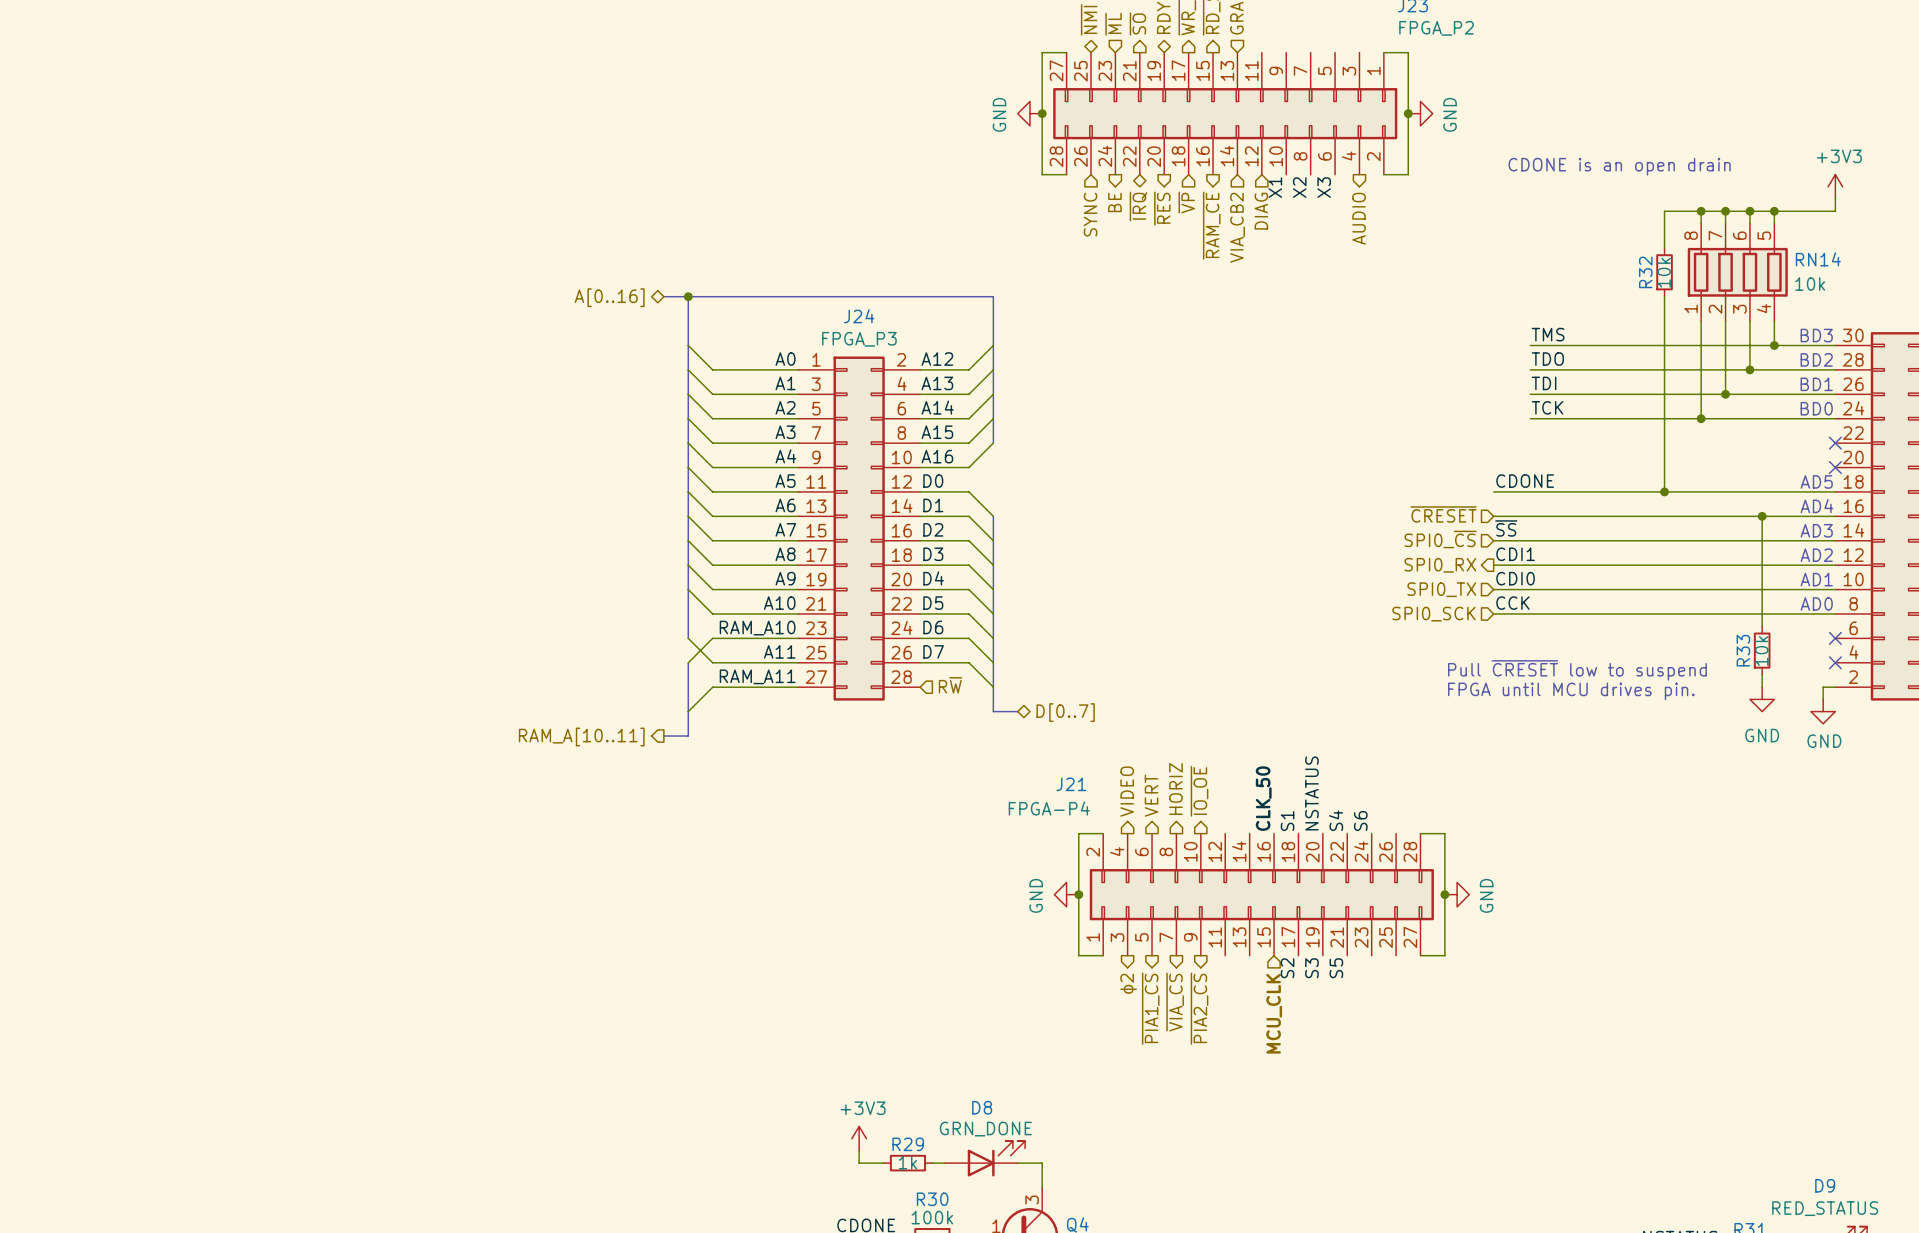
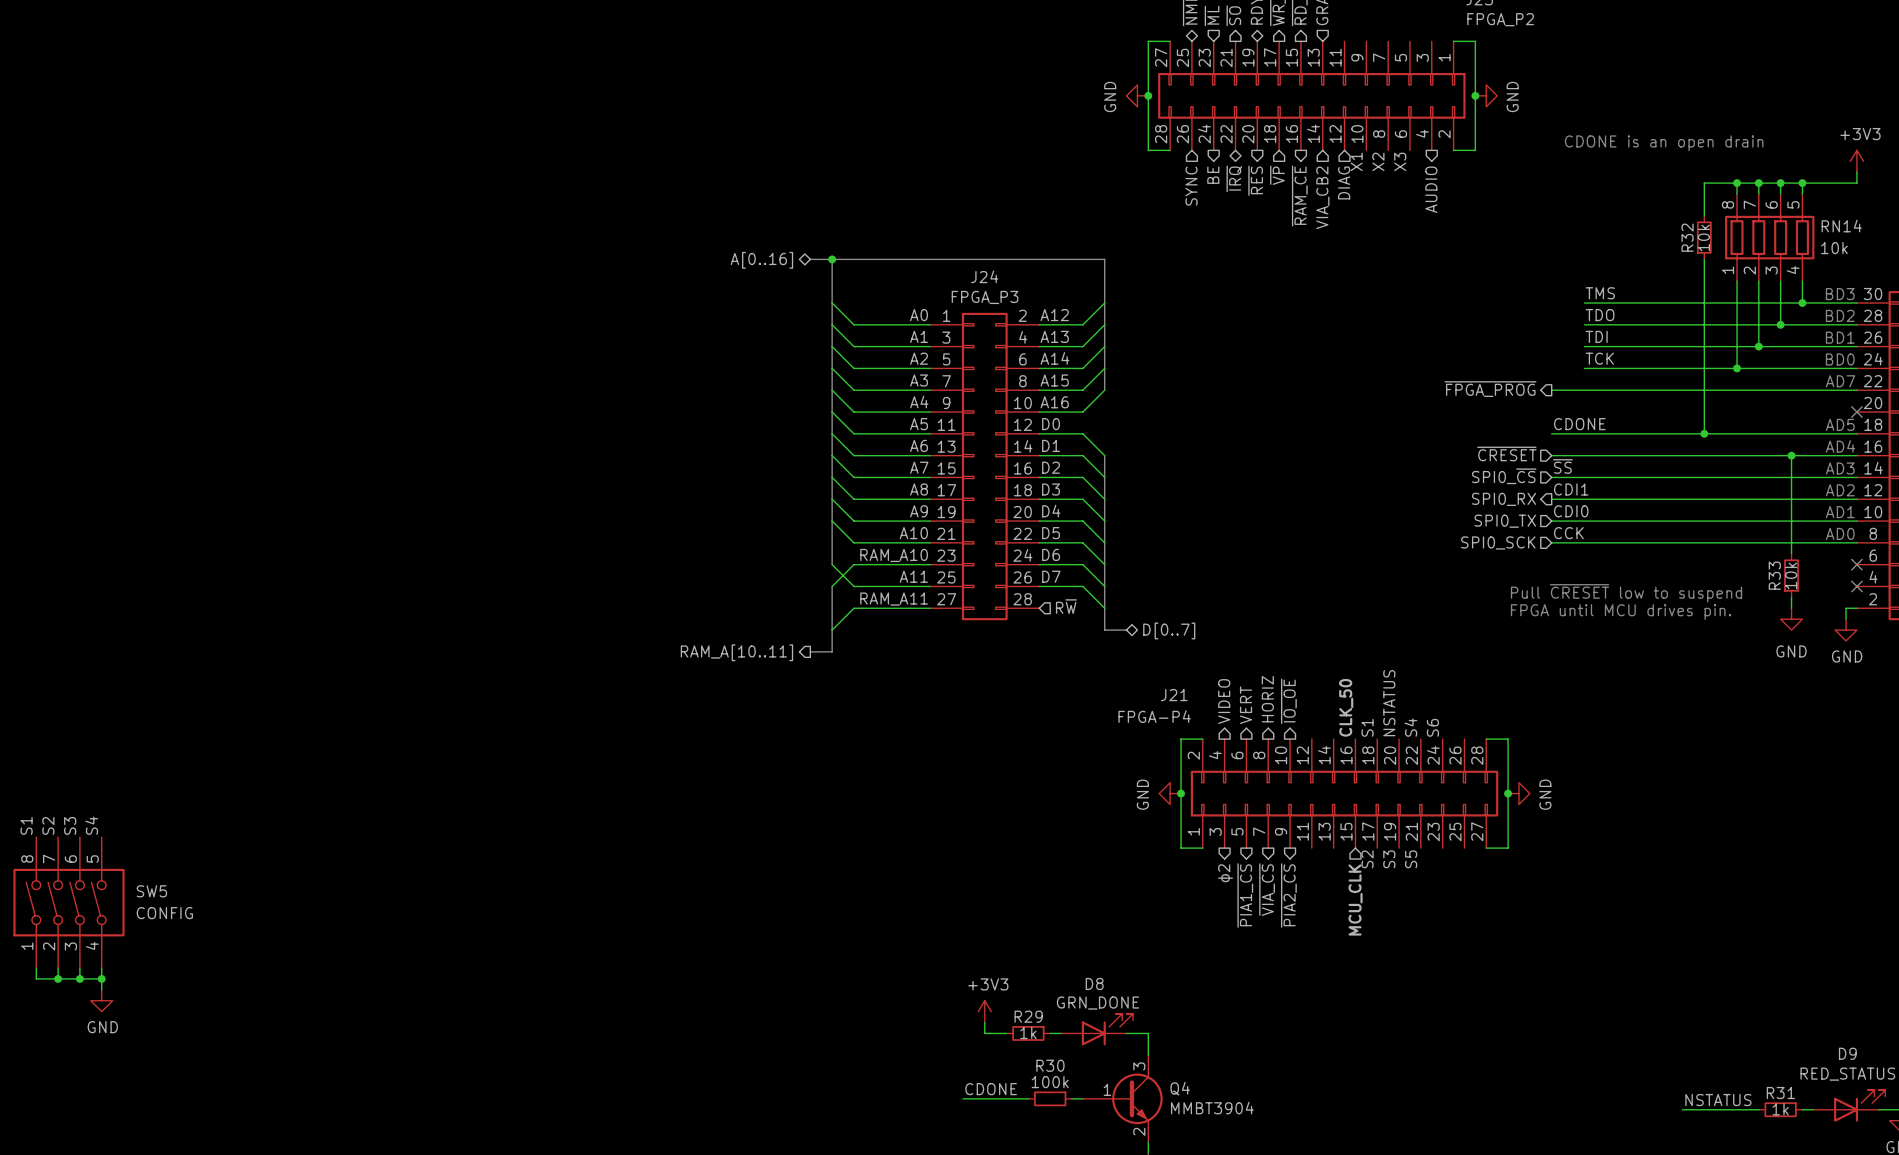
text: none -> AD7 (1840, 381)
hierarchical label: none -> ~{FPGA_PROG} (1490, 389)
wire: none -> (1551, 390) (1856, 390)
no-connect mark: (1835, 443) -> none

